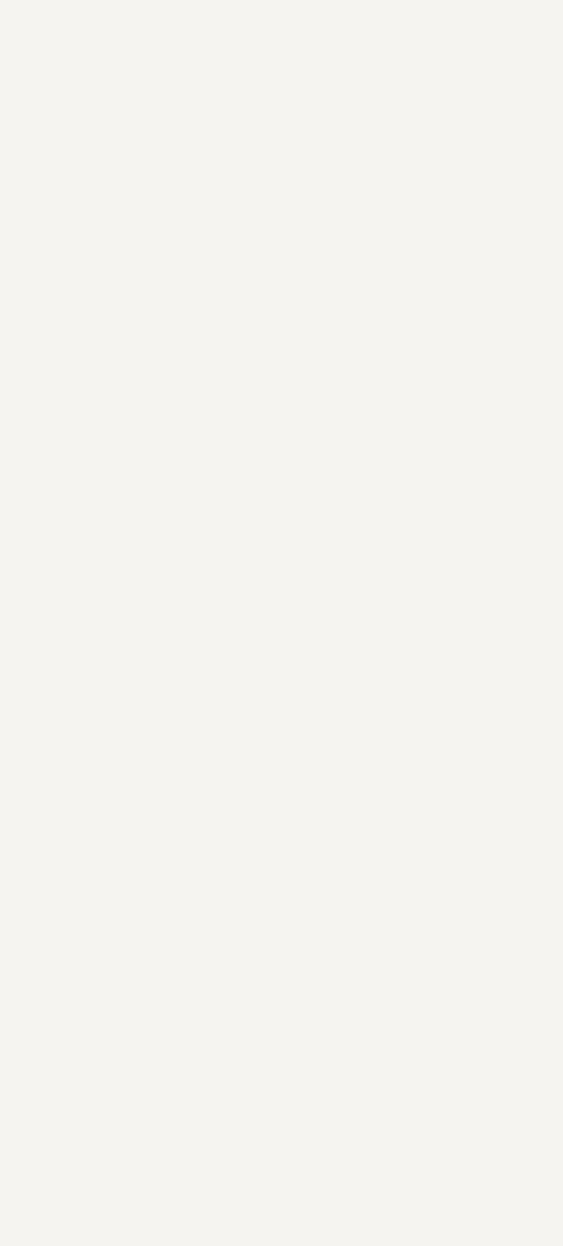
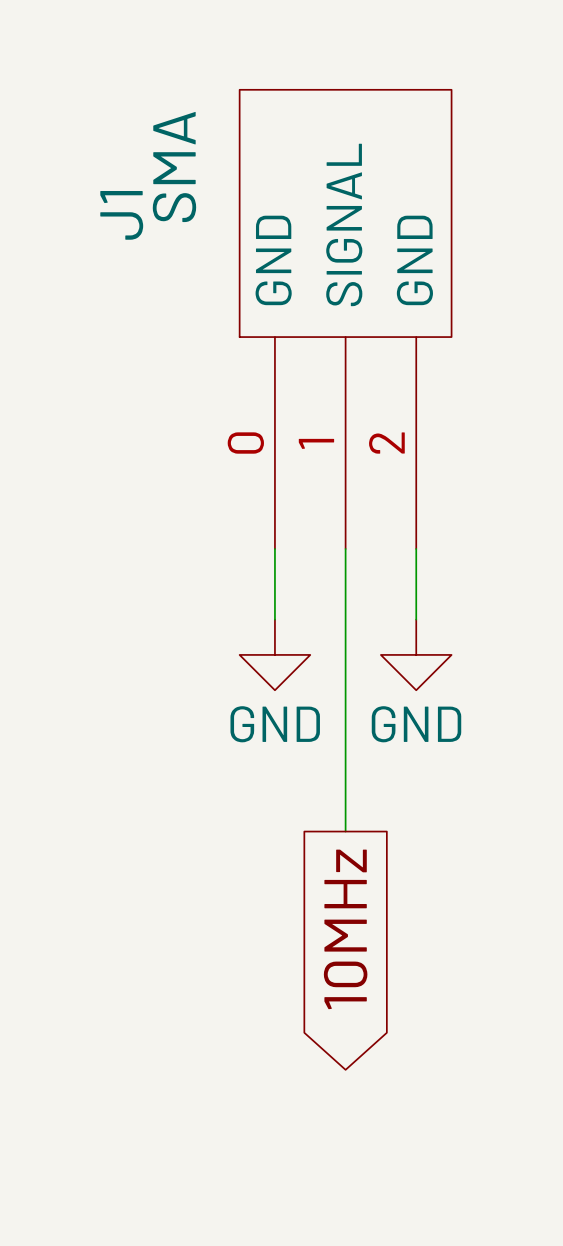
J1: none -> SMA (345, 319)
wire: none -> (274, 548) (274, 619)
wire: none -> (345, 548) (345, 831)
wire: none -> (416, 548) (416, 619)
power symbol: none -> GND (274, 654)
power symbol: none -> GND (416, 654)
global label: none -> 10MHz (345, 929)

